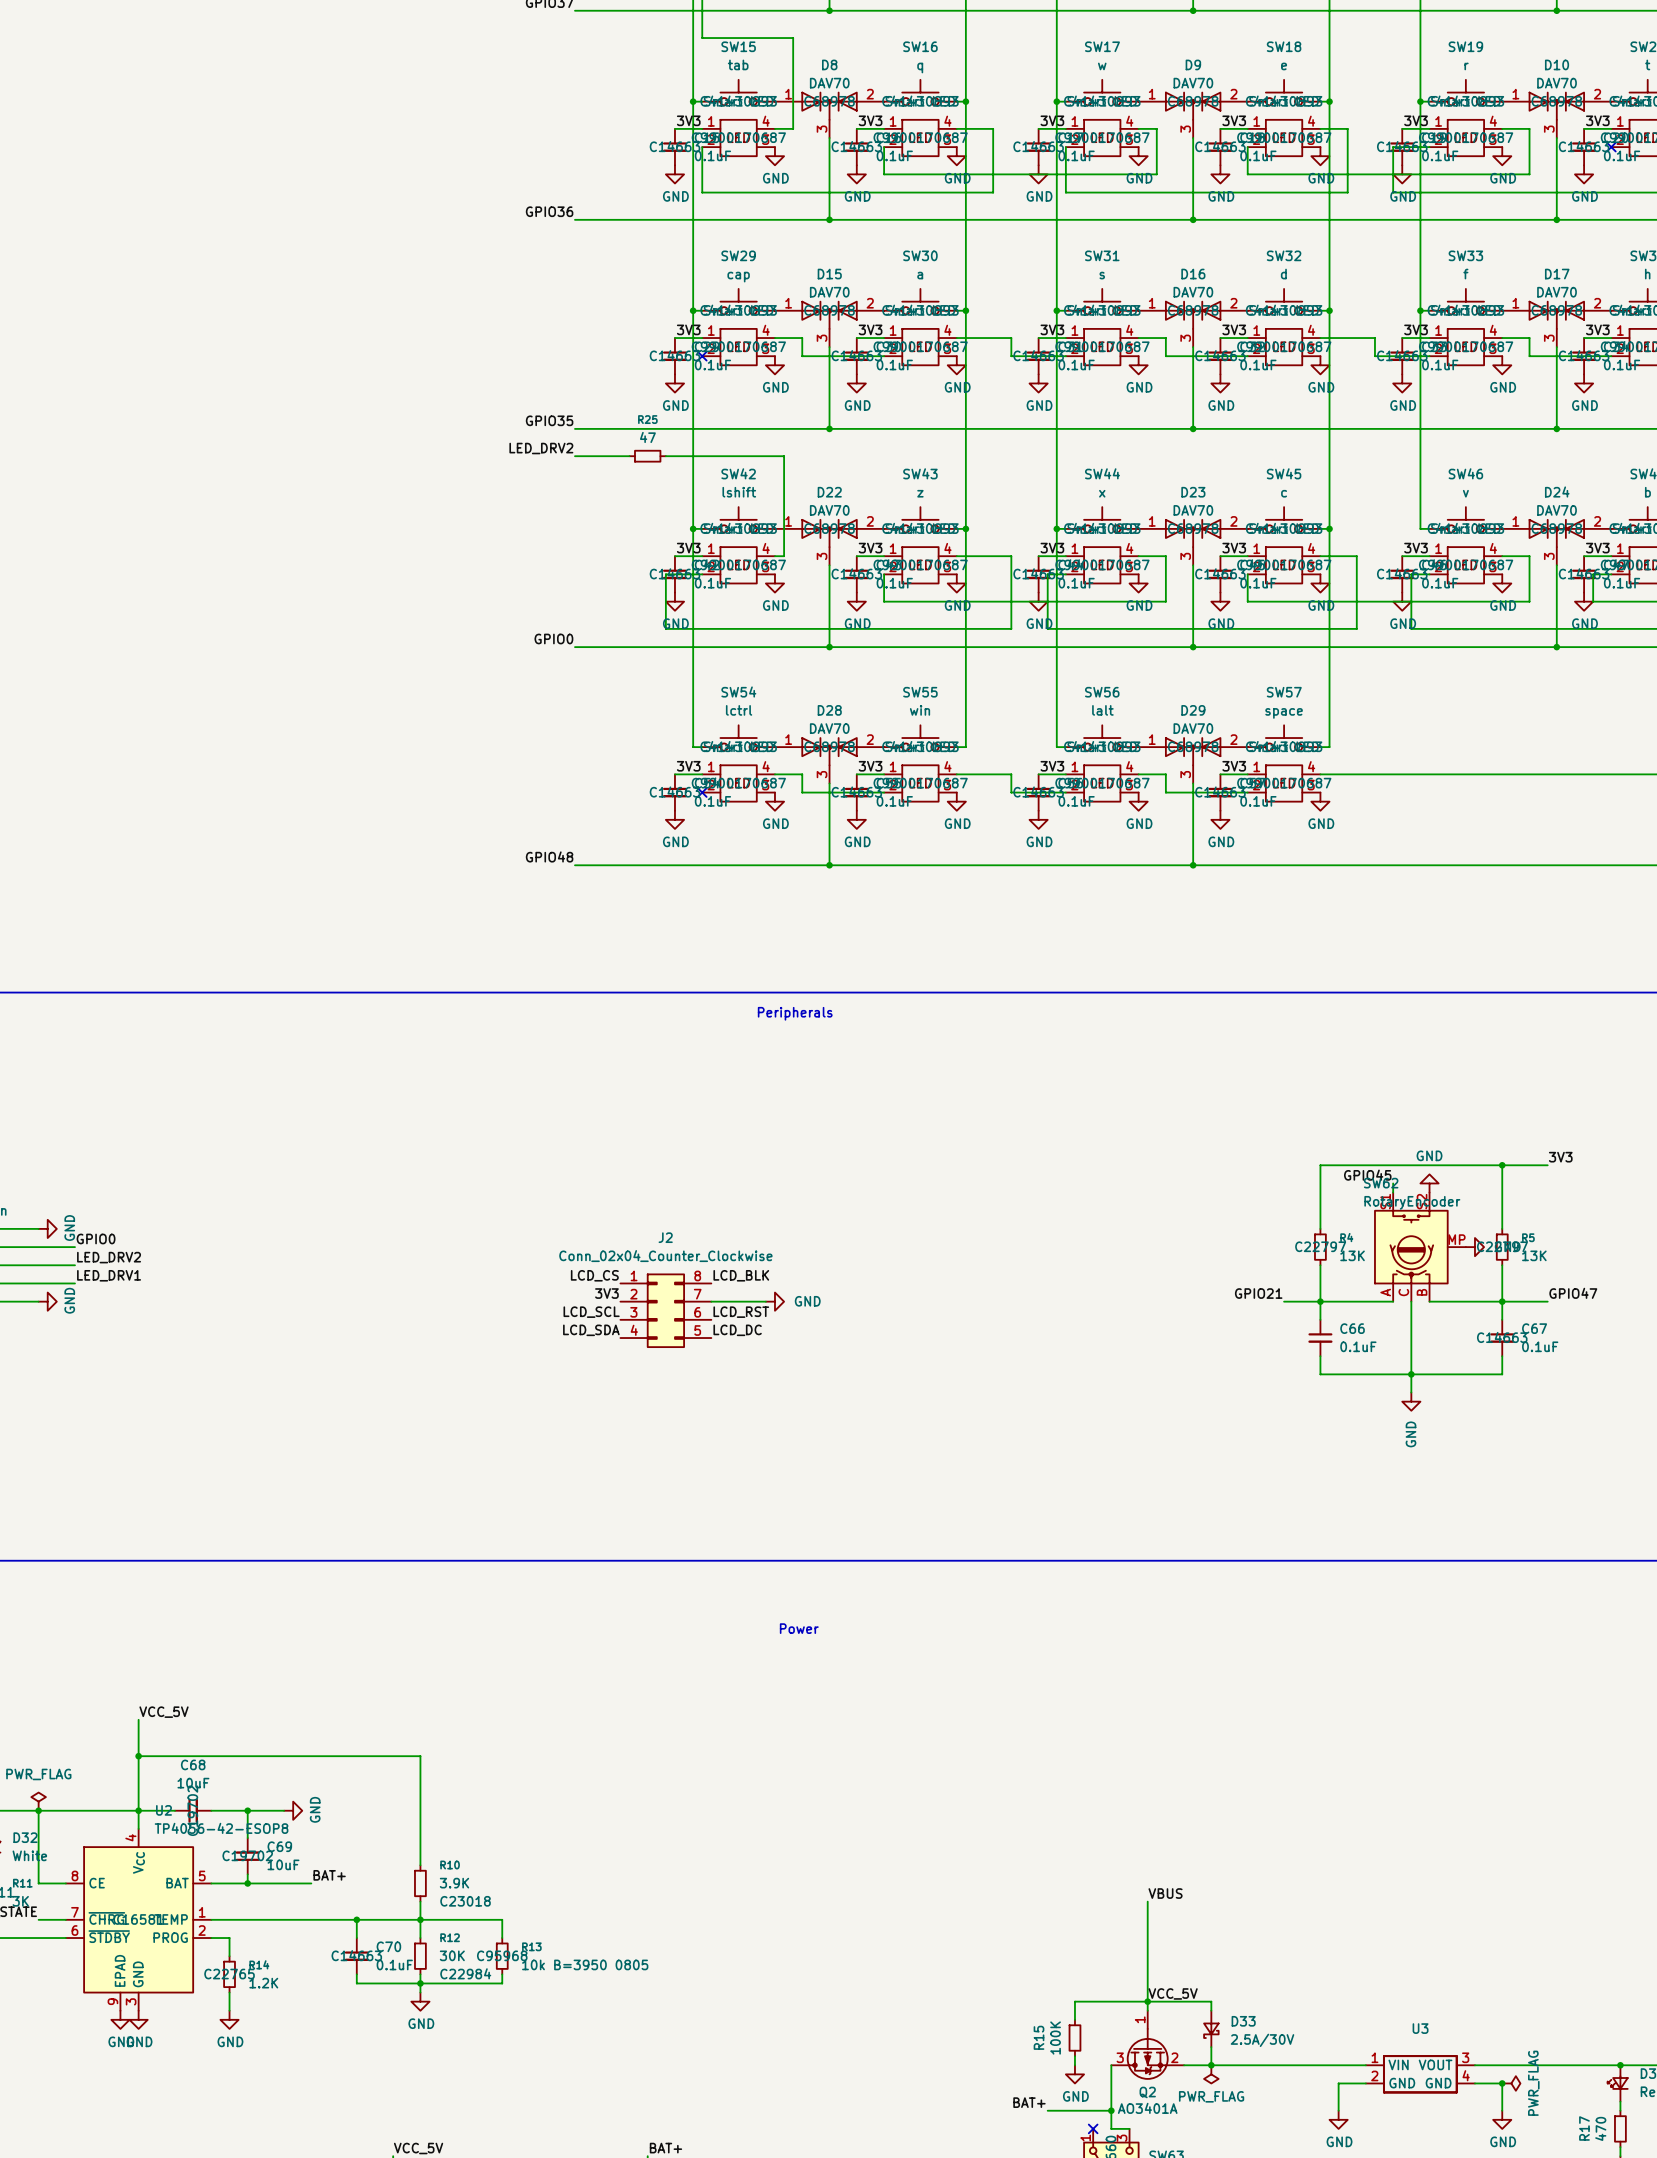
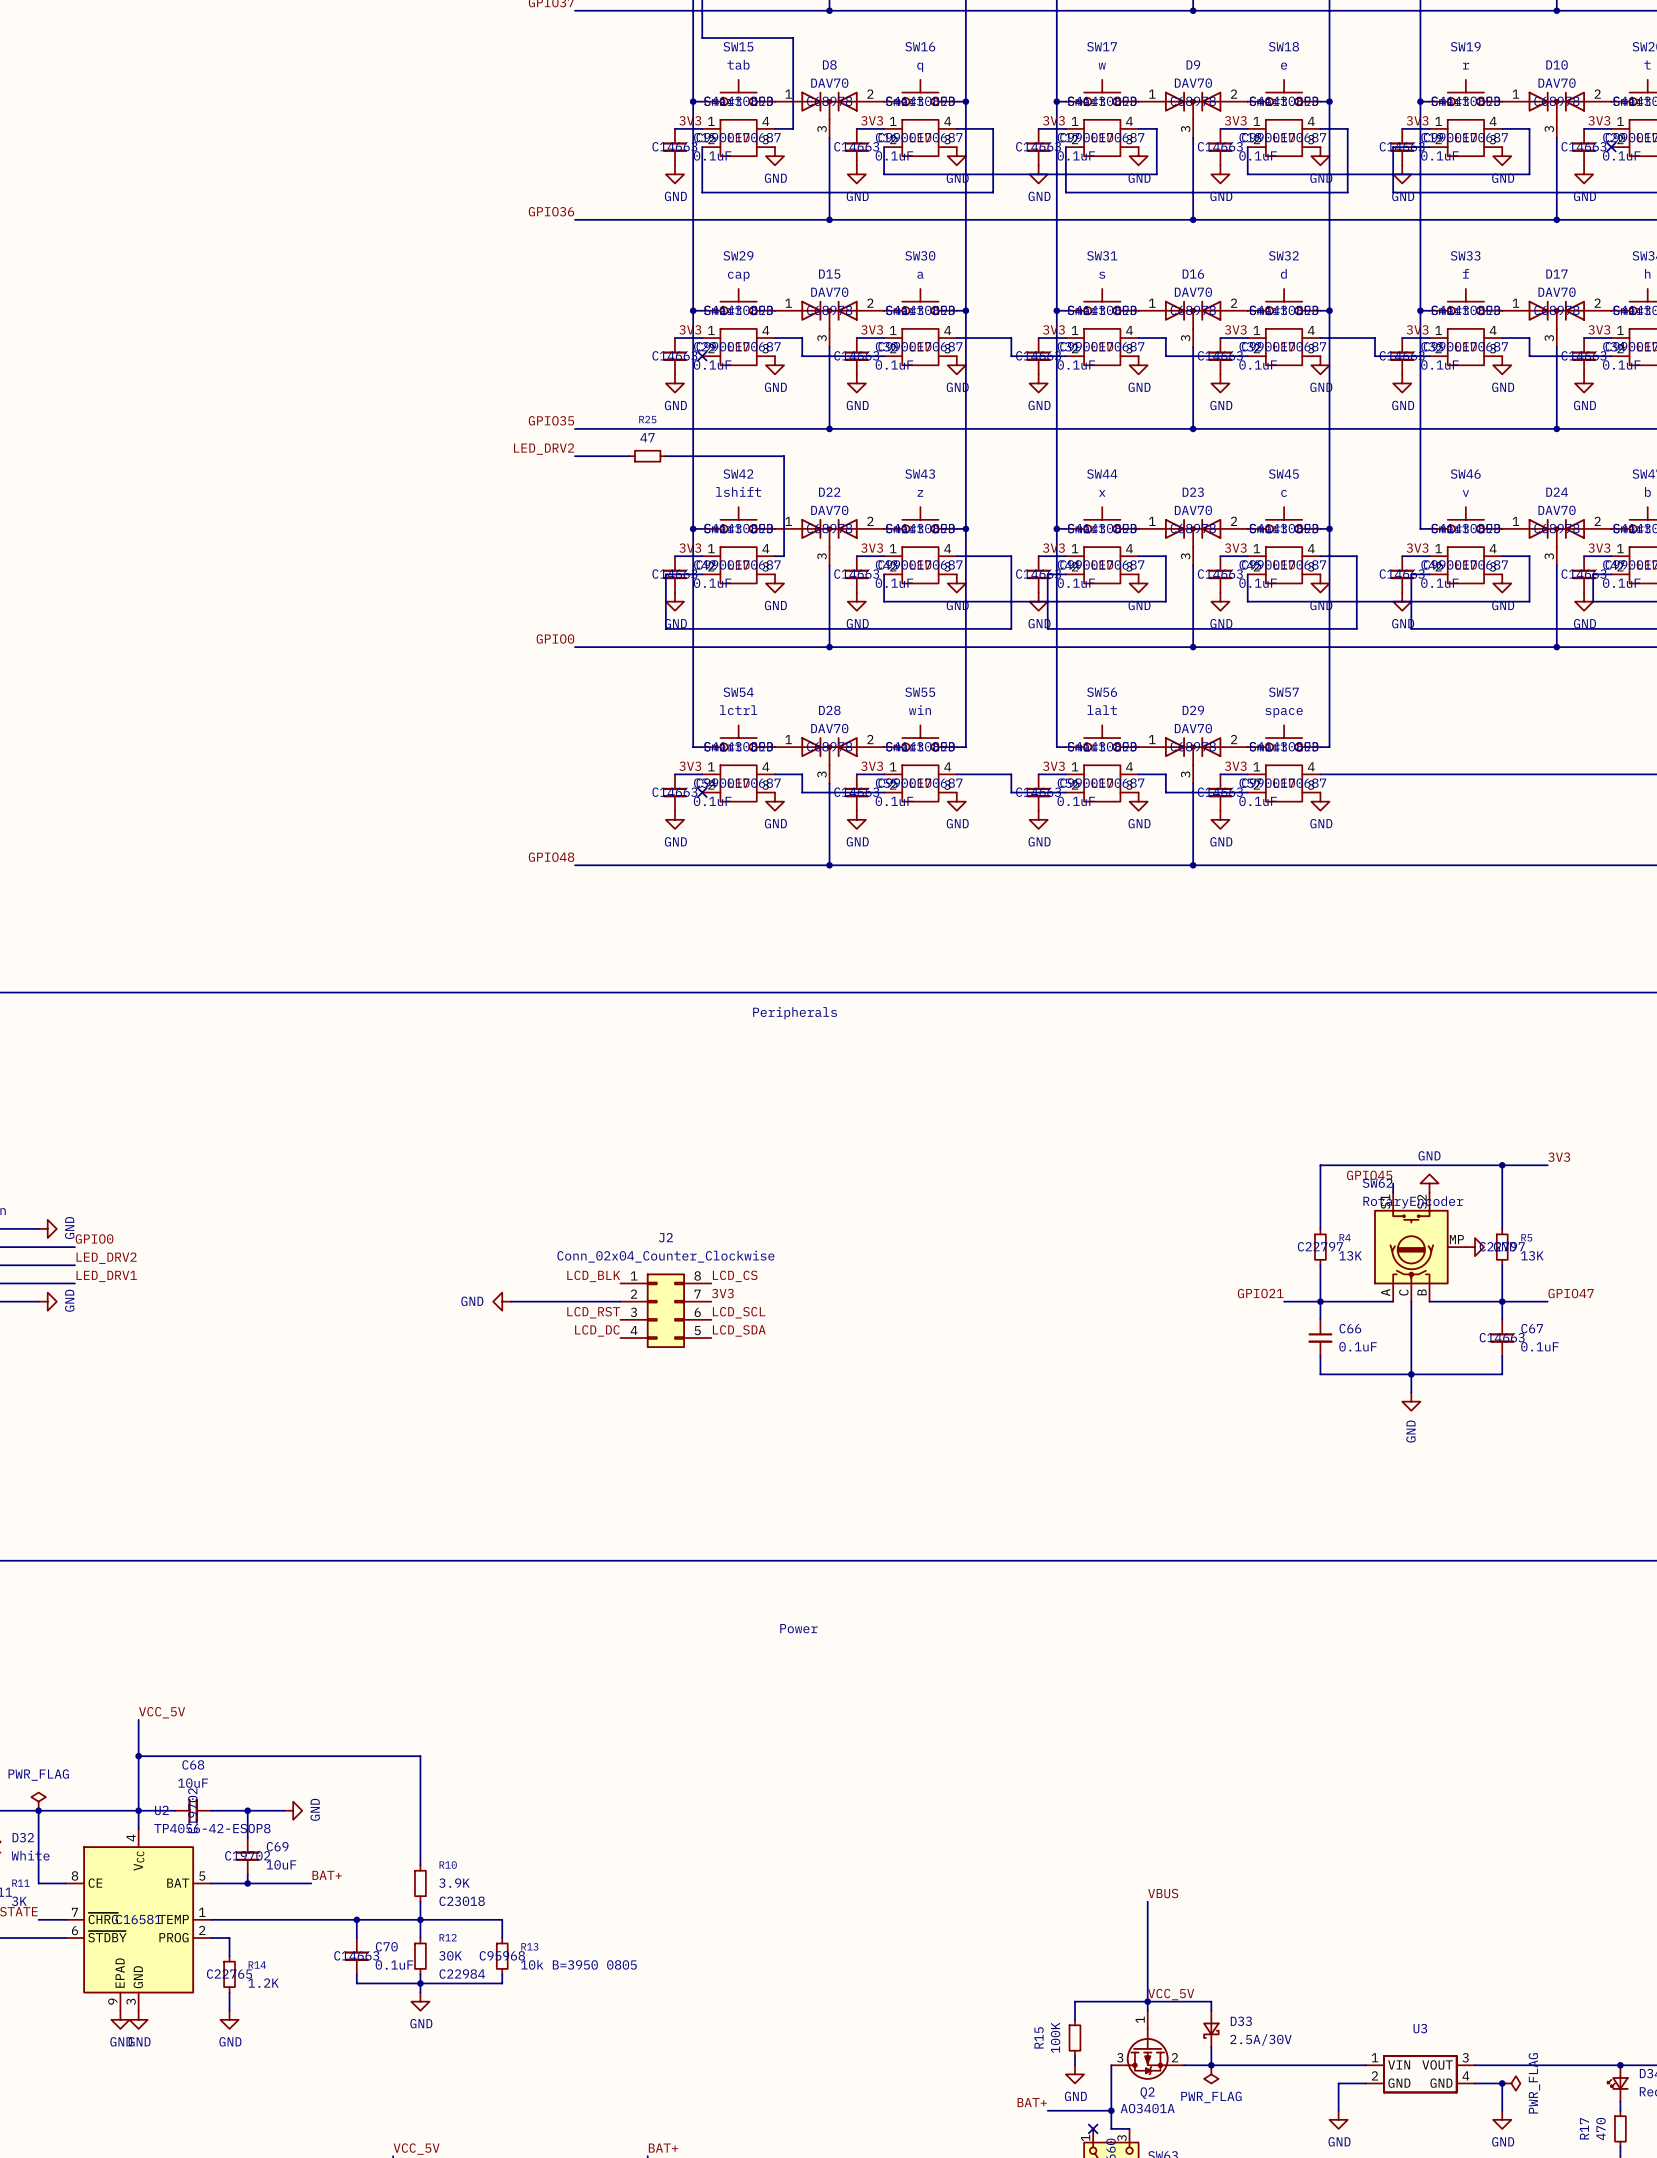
label: LCD_CS (594, 1275) -> LCD_BLK (593, 1276)
label: LCD_BLK (741, 1275) -> LCD_CS (735, 1276)
label position: 3V3 (606, 1293) -> 3V3 (722, 1293)
power symbol: none -> GND (502, 1301)
wire: none -> (511, 1301) (620, 1301)
wire: (711, 1301) (765, 1301) -> none
power symbol: GND (774, 1301) -> none
label: LCD_SCL (591, 1312) -> LCD_RST (593, 1312)
label: LCD_RST (741, 1312) -> LCD_SCL (739, 1312)
label: LCD_SDA (591, 1330) -> LCD_DC (597, 1330)
label: LCD_DC (737, 1330) -> LCD_SDA (739, 1330)

